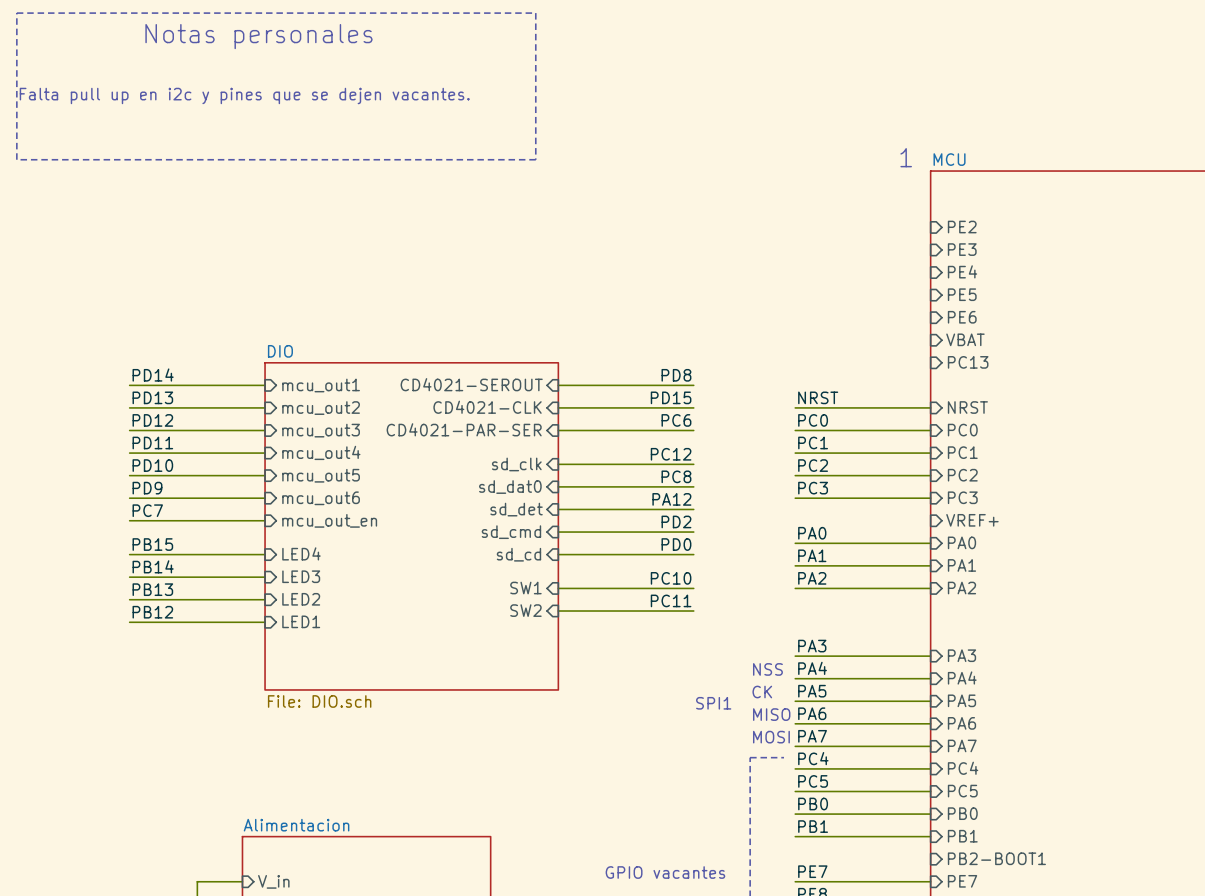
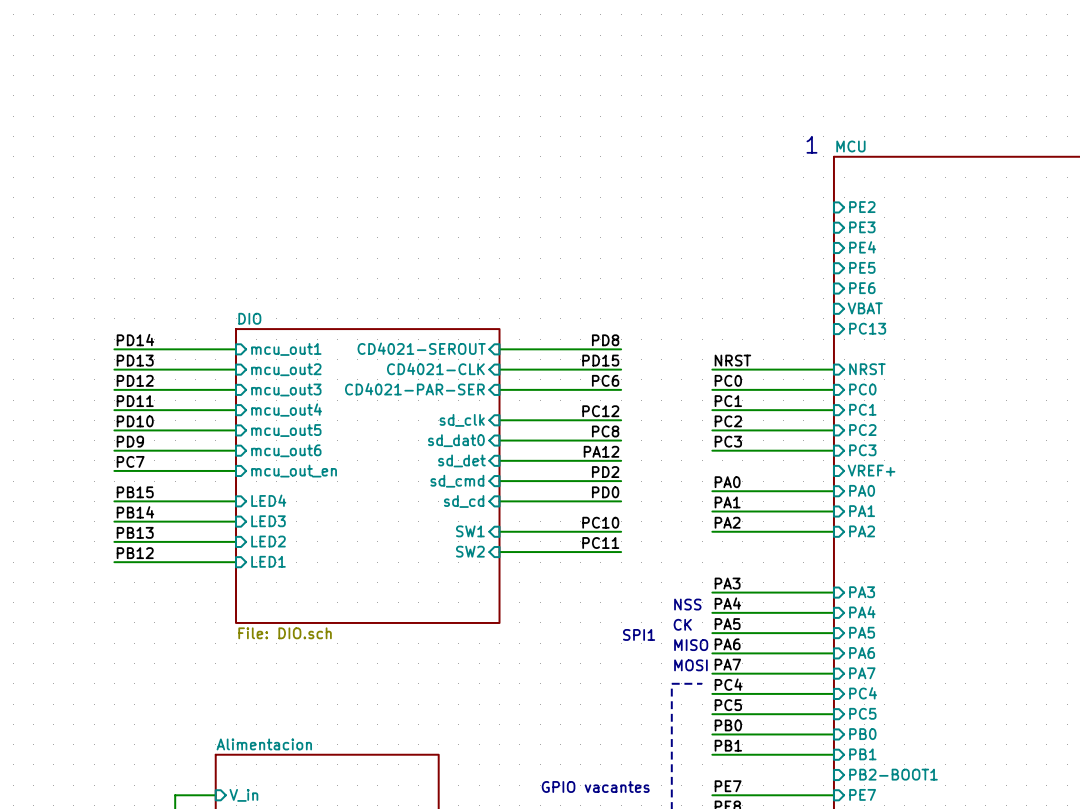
line: (16, 13) (535, 13) (535, 159) (16, 159) (16, 13) -> none
text: Notas personales (258, 36) -> none
text: Falta pull up en i2c y pines que se dejen vacantes. (244, 95) -> none

